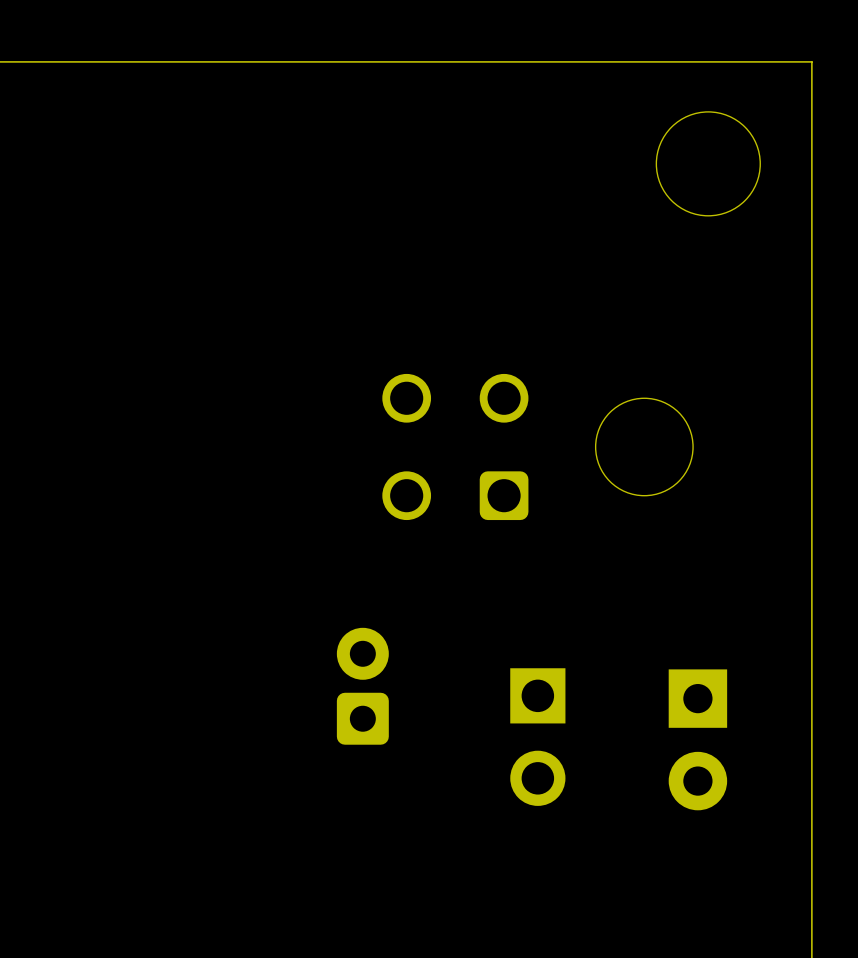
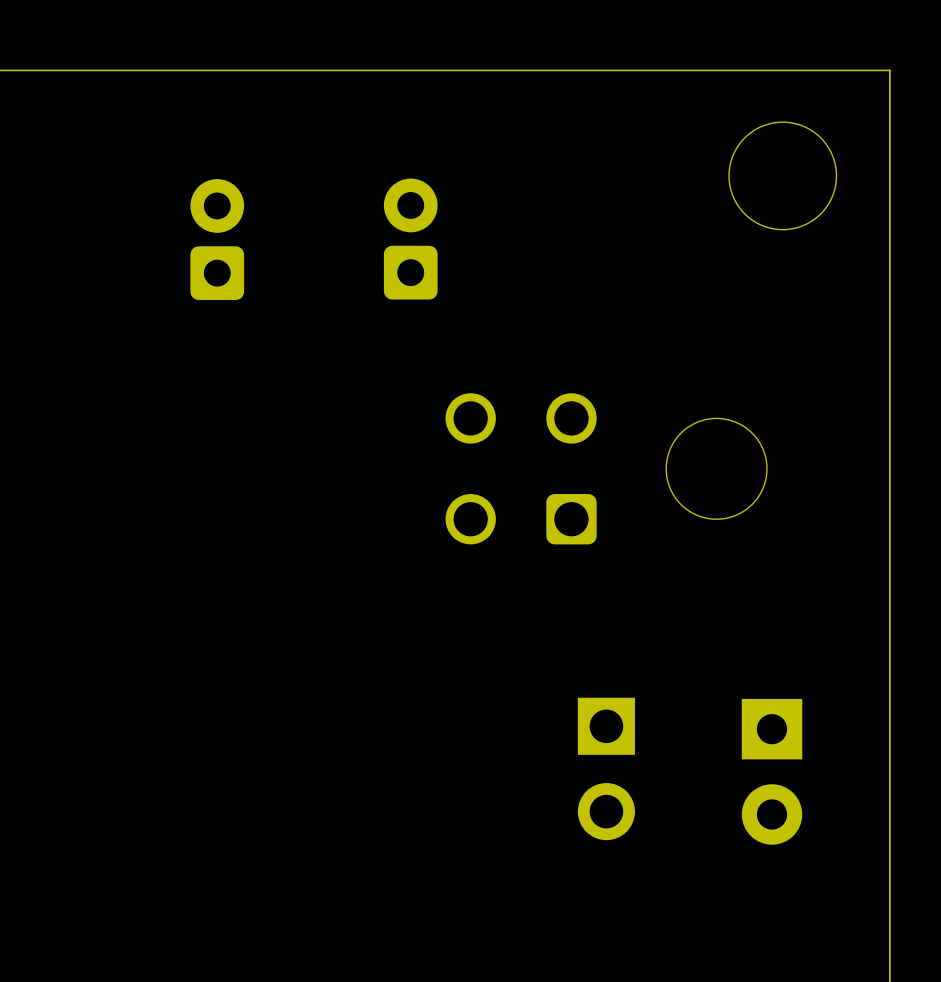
part: none -> (410, 239)
part: none -> (217, 239)
part: (362, 686) -> none

